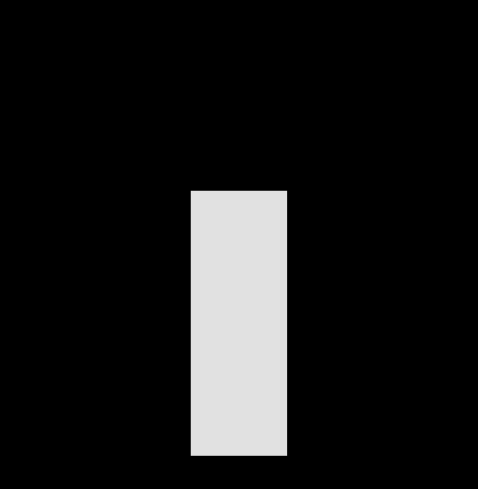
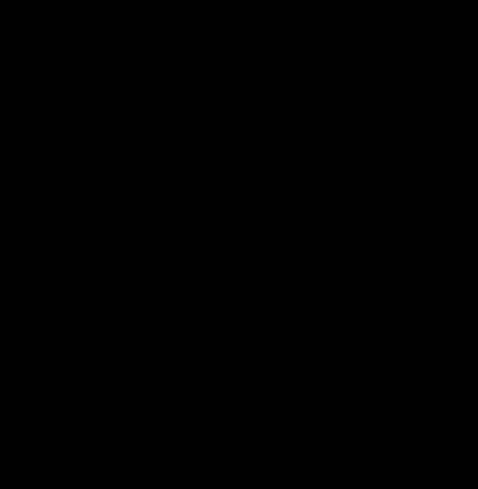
drawing: [190, 190, 288, 456] -> none

